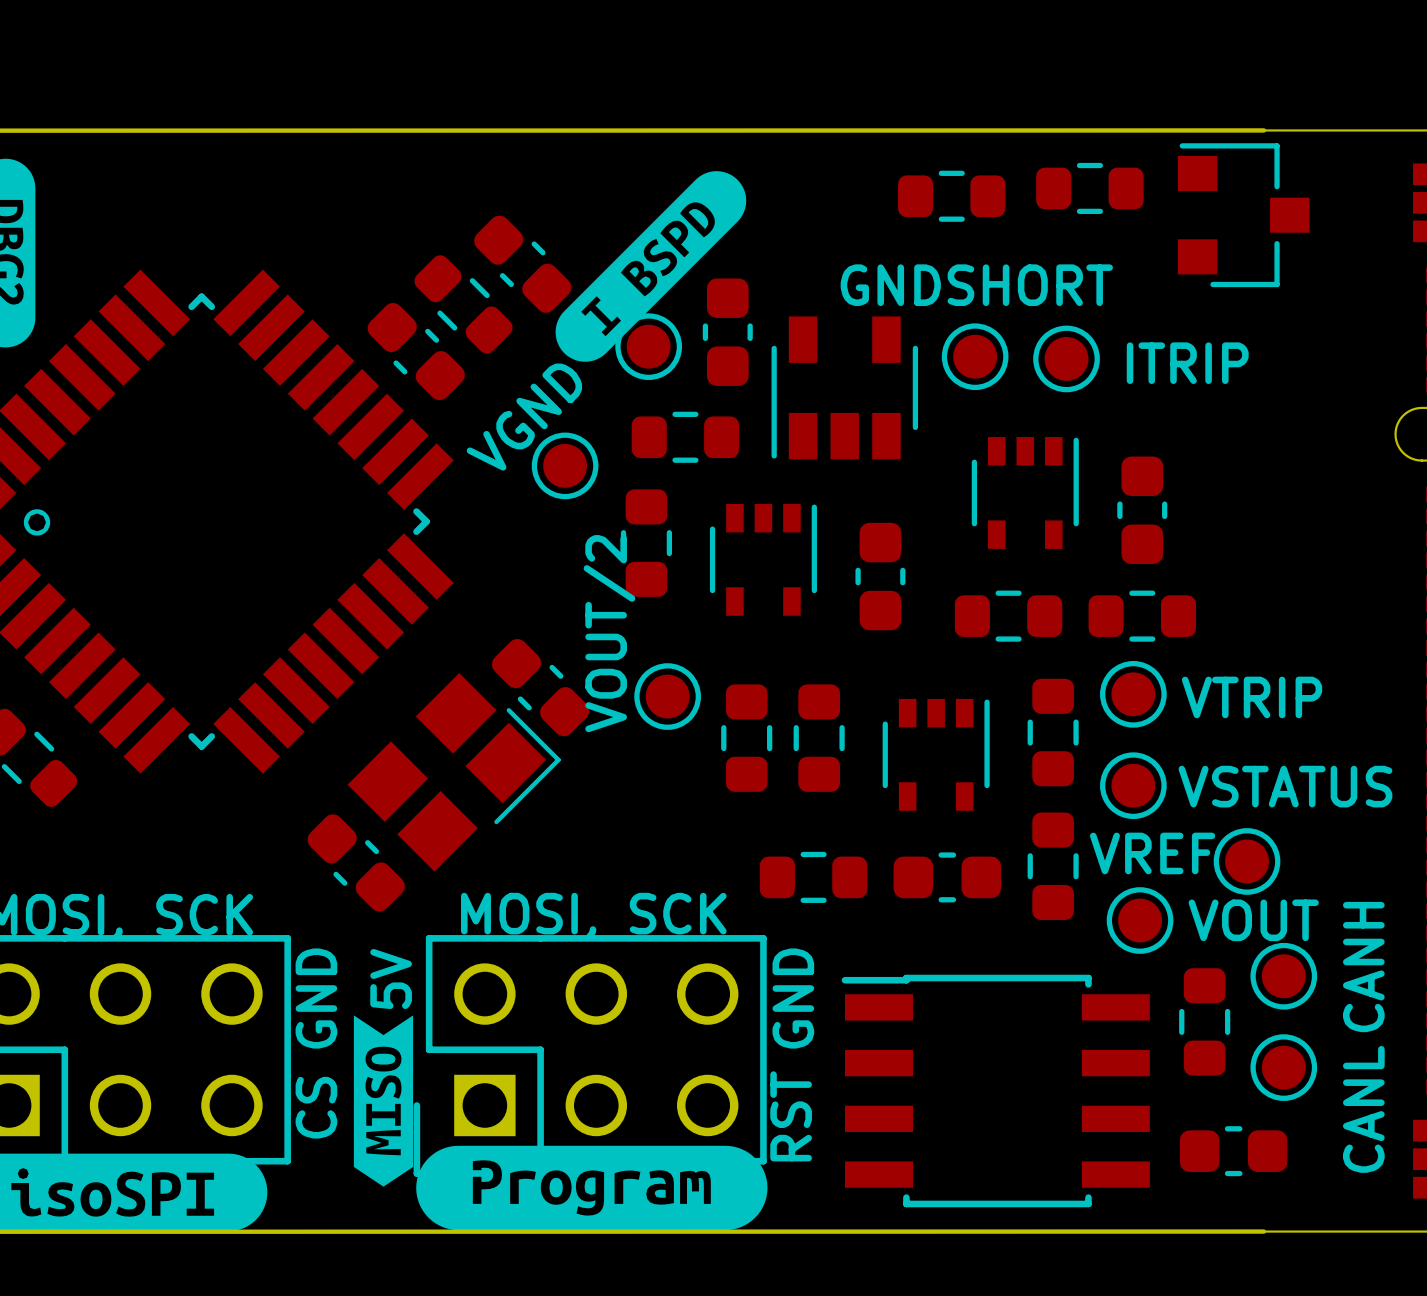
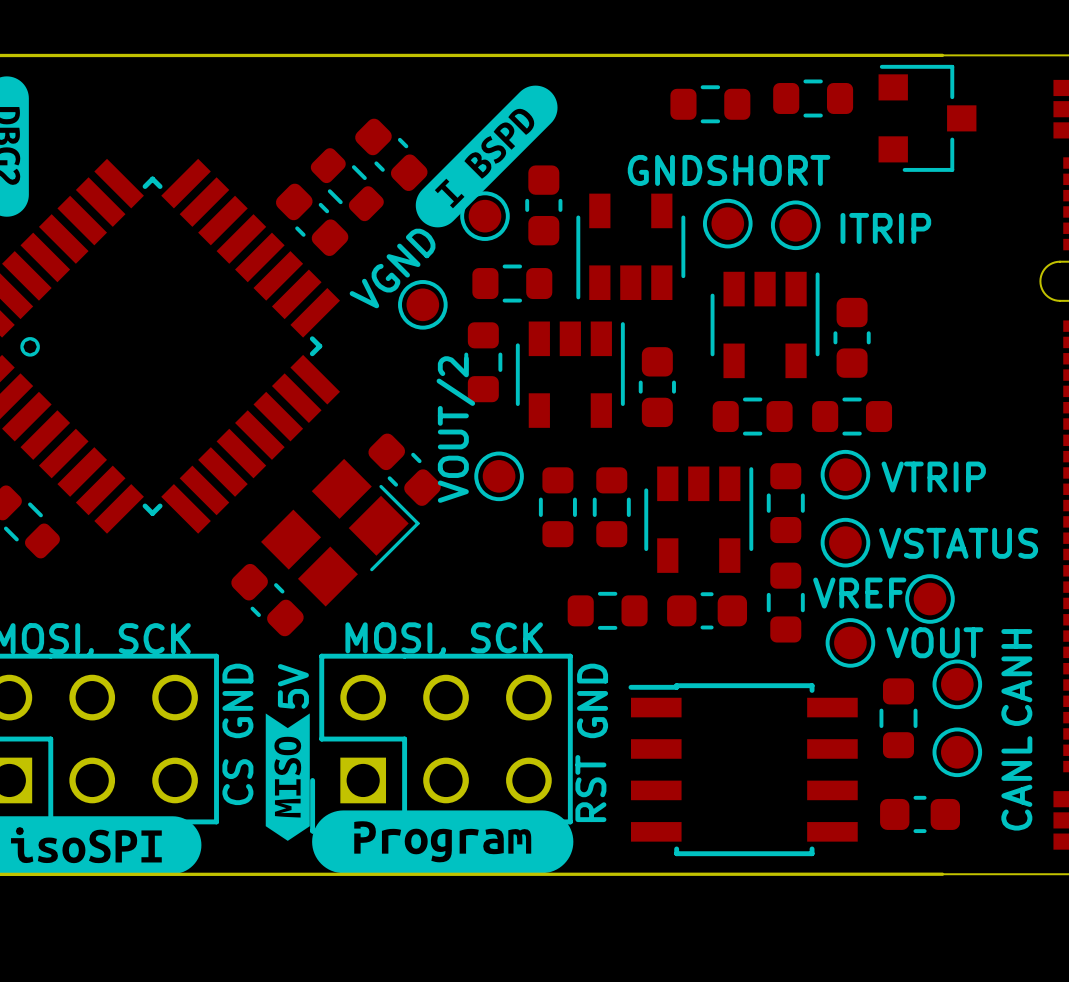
part footprint: [971, 437, 1079, 549] -> [710, 271, 820, 379]
part footprint: [709, 503, 817, 616] -> [515, 321, 625, 428]
part footprint: [882, 698, 990, 811] -> [644, 466, 754, 573]

